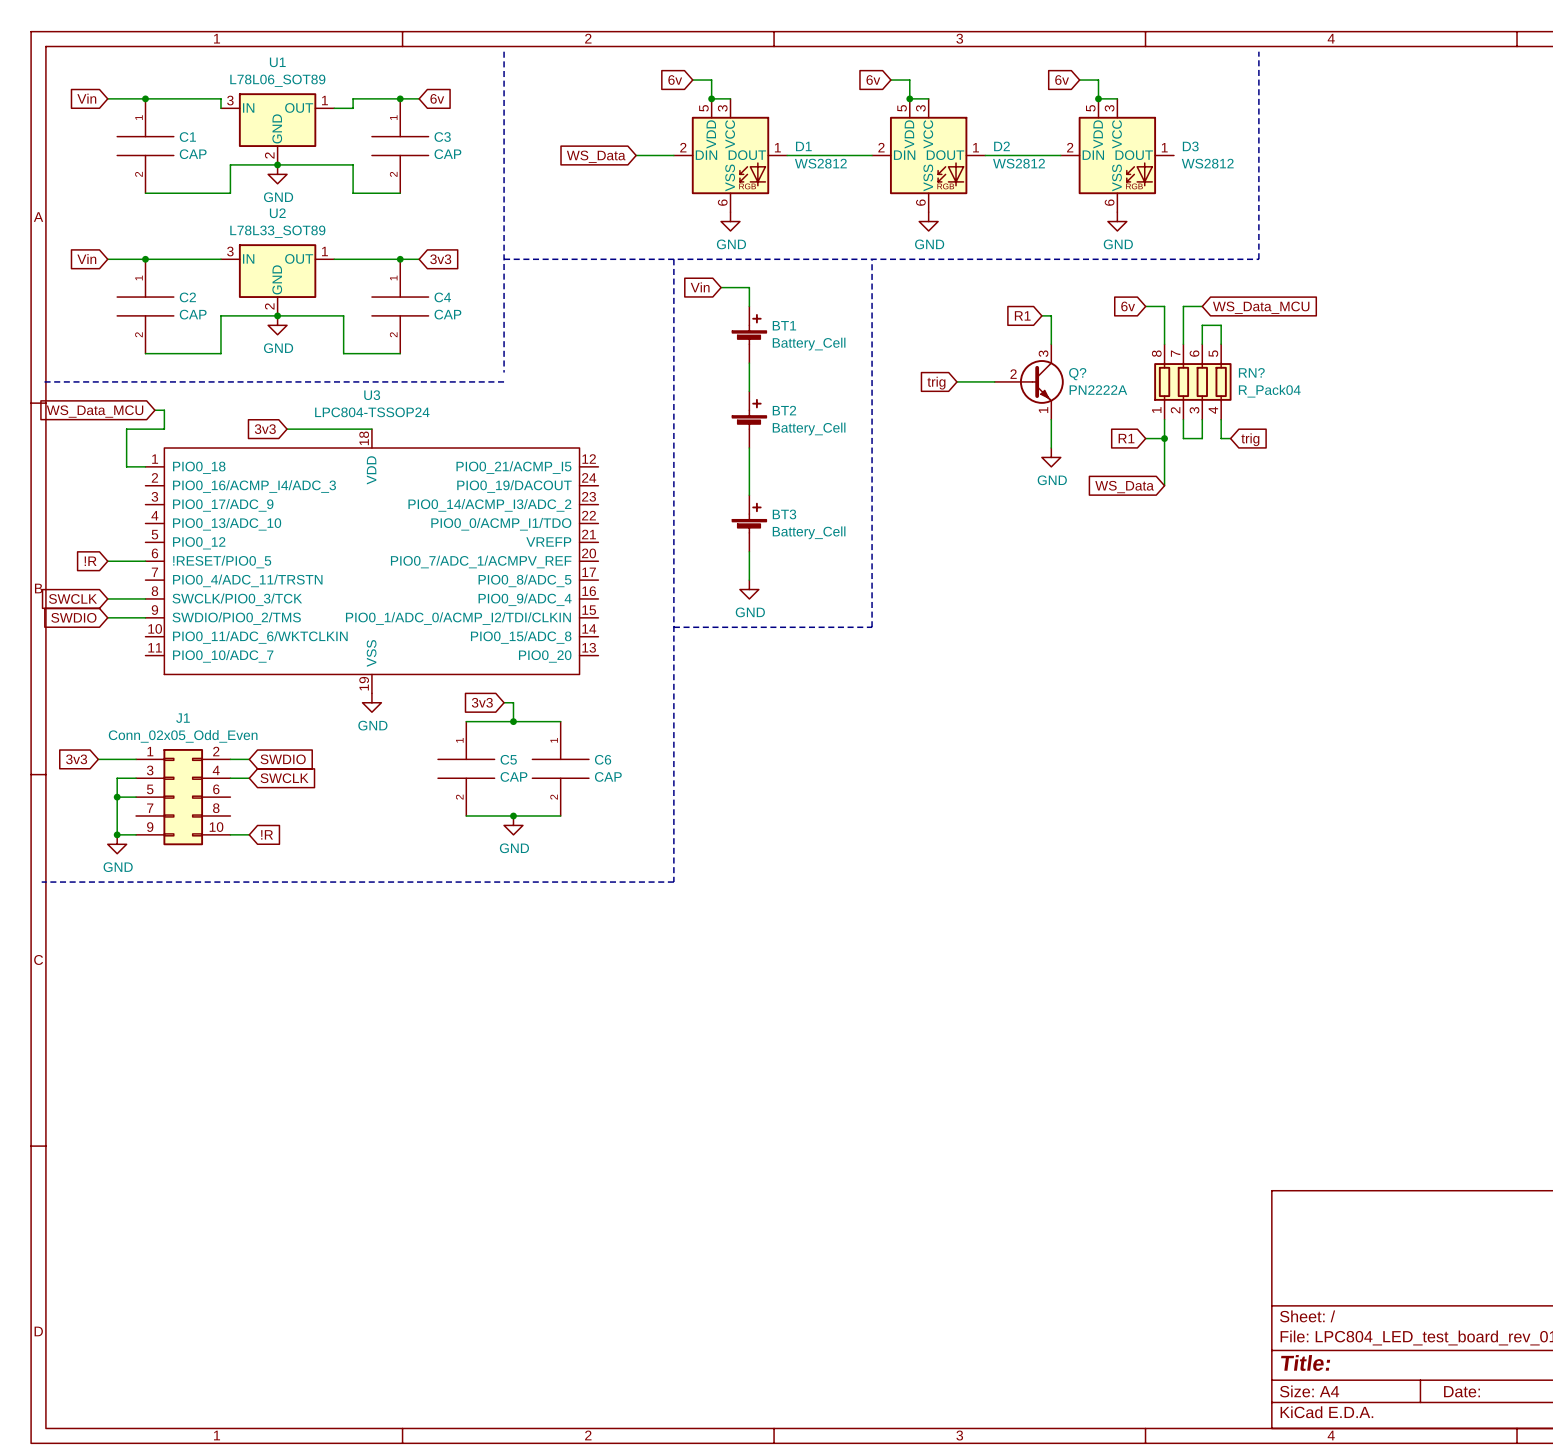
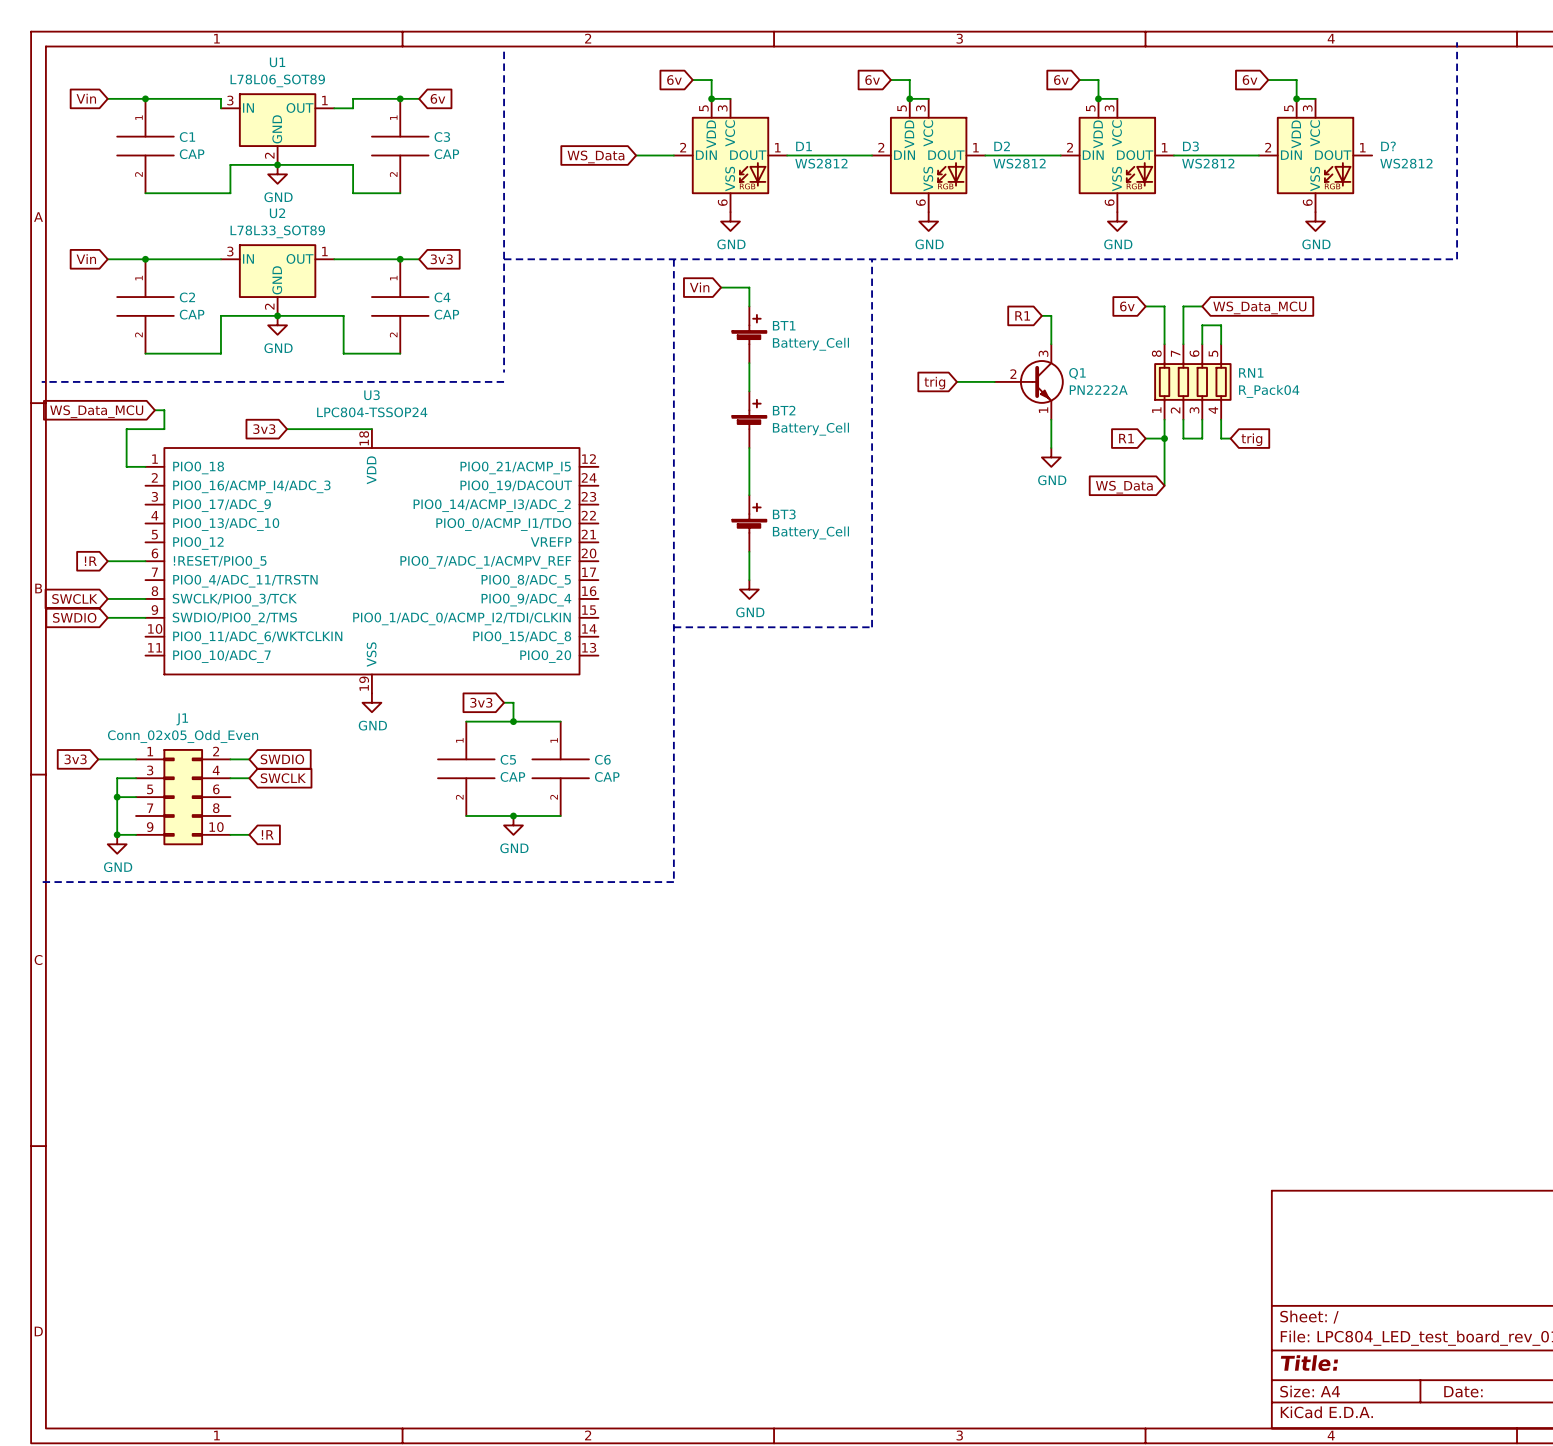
line: (1258, 51) (1258, 259) -> (1457, 42) (1457, 259) (1258, 259)
global label: none -> 6v (1250, 80)
wire: none -> (1268, 80) (1296, 80) (1296, 98) (1315, 98)
junction: none -> (1296, 98)
wire: none -> (1173, 155) (1258, 155)
D?: none -> WS2812 (1315, 155)
power symbol: none -> GND (1315, 221)
RN? name: RN? (1251, 372) -> RN1 (1251, 372)
Q? name: Q? (1077, 374) -> Q1 (1077, 373)

